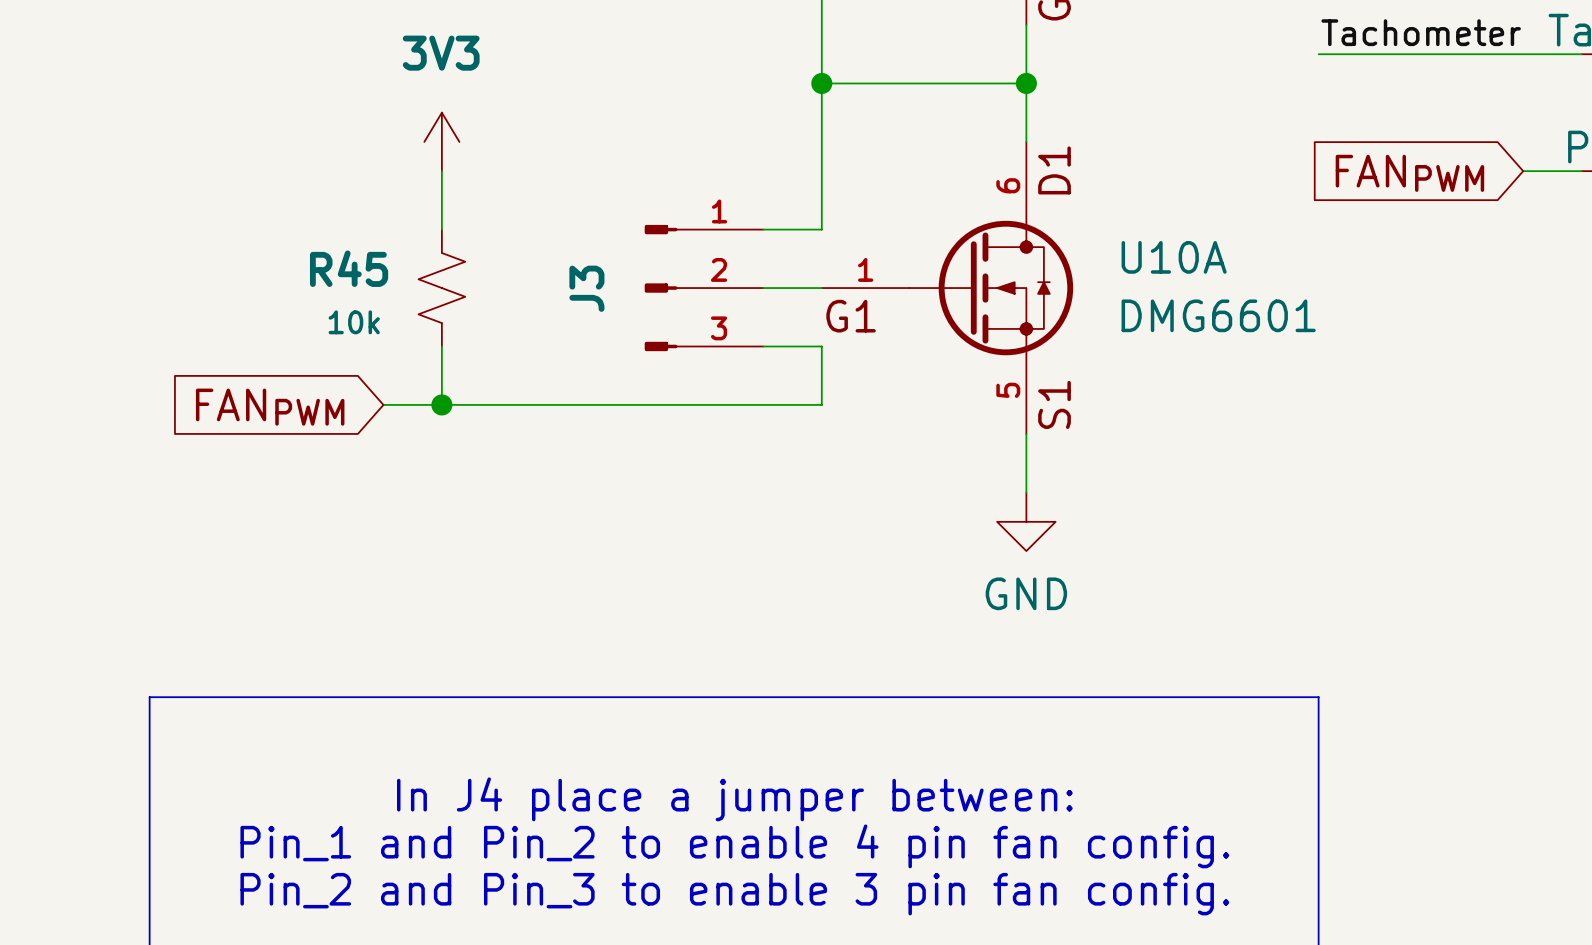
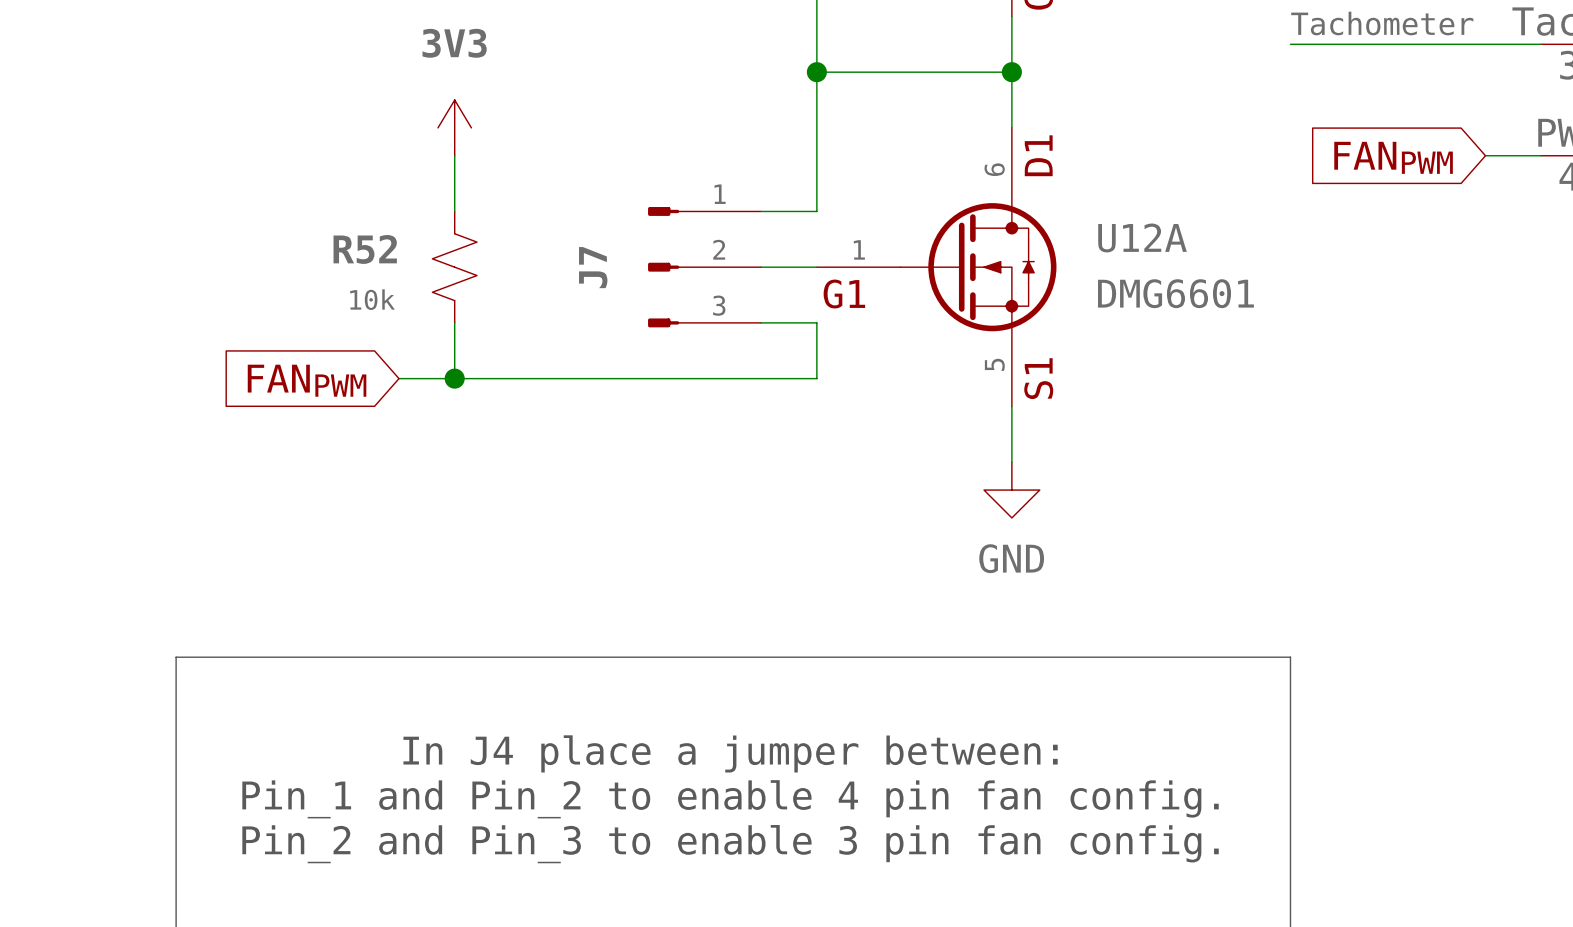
U10A name: U10A (1174, 257) -> U12A (1142, 237)
R45 name: R45 (349, 268) -> R52 (365, 249)
J3 name: J3 (586, 288) -> J7 (593, 267)

